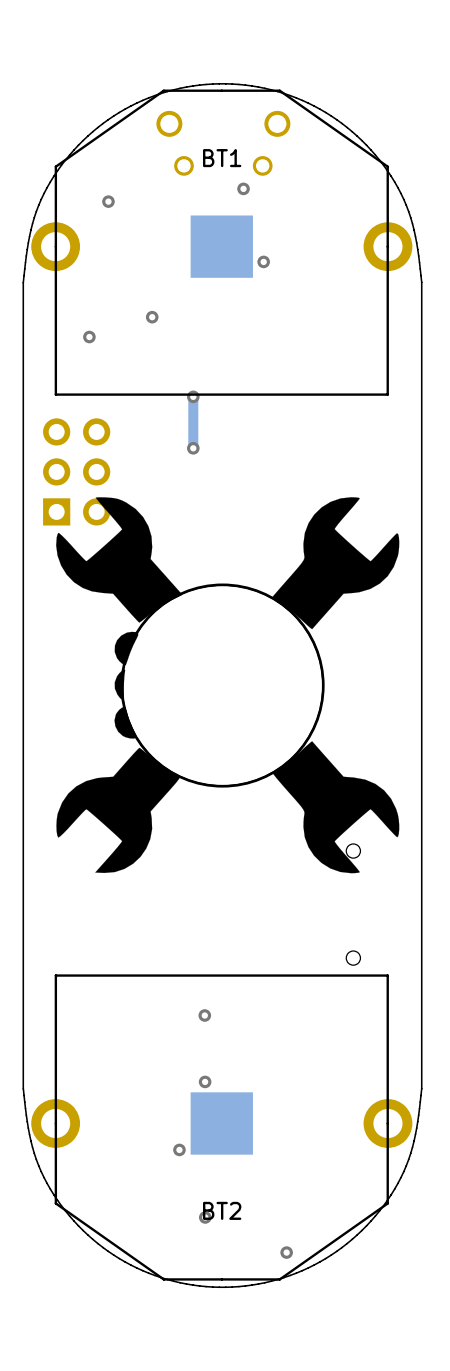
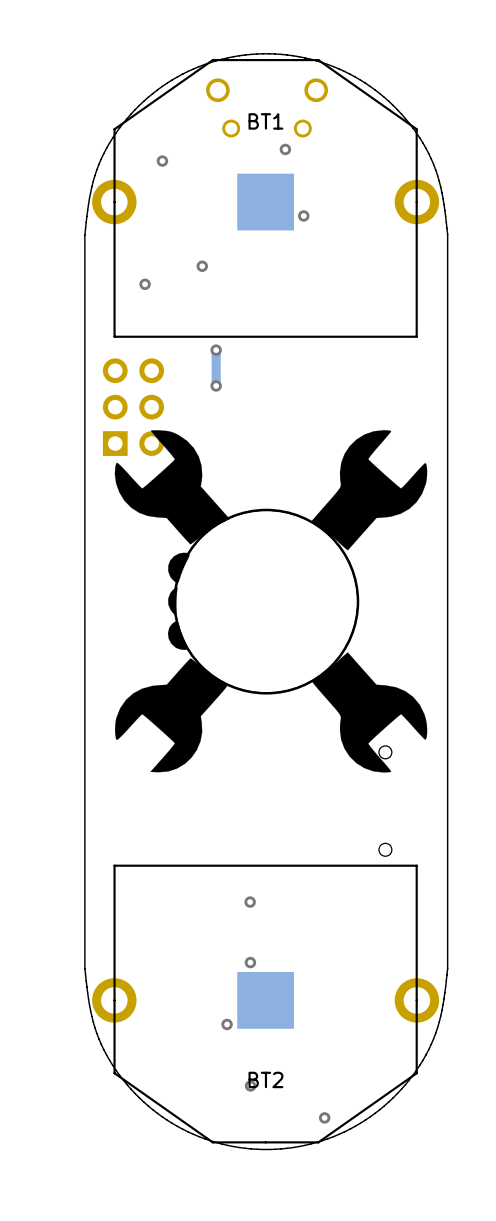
track: (193, 396) (193, 448) -> none
via: (193, 396) -> none
track: none -> (216, 350) (216, 385)
via: none -> (216, 350)
via: none -> (216, 385)
via: (193, 448) -> none

